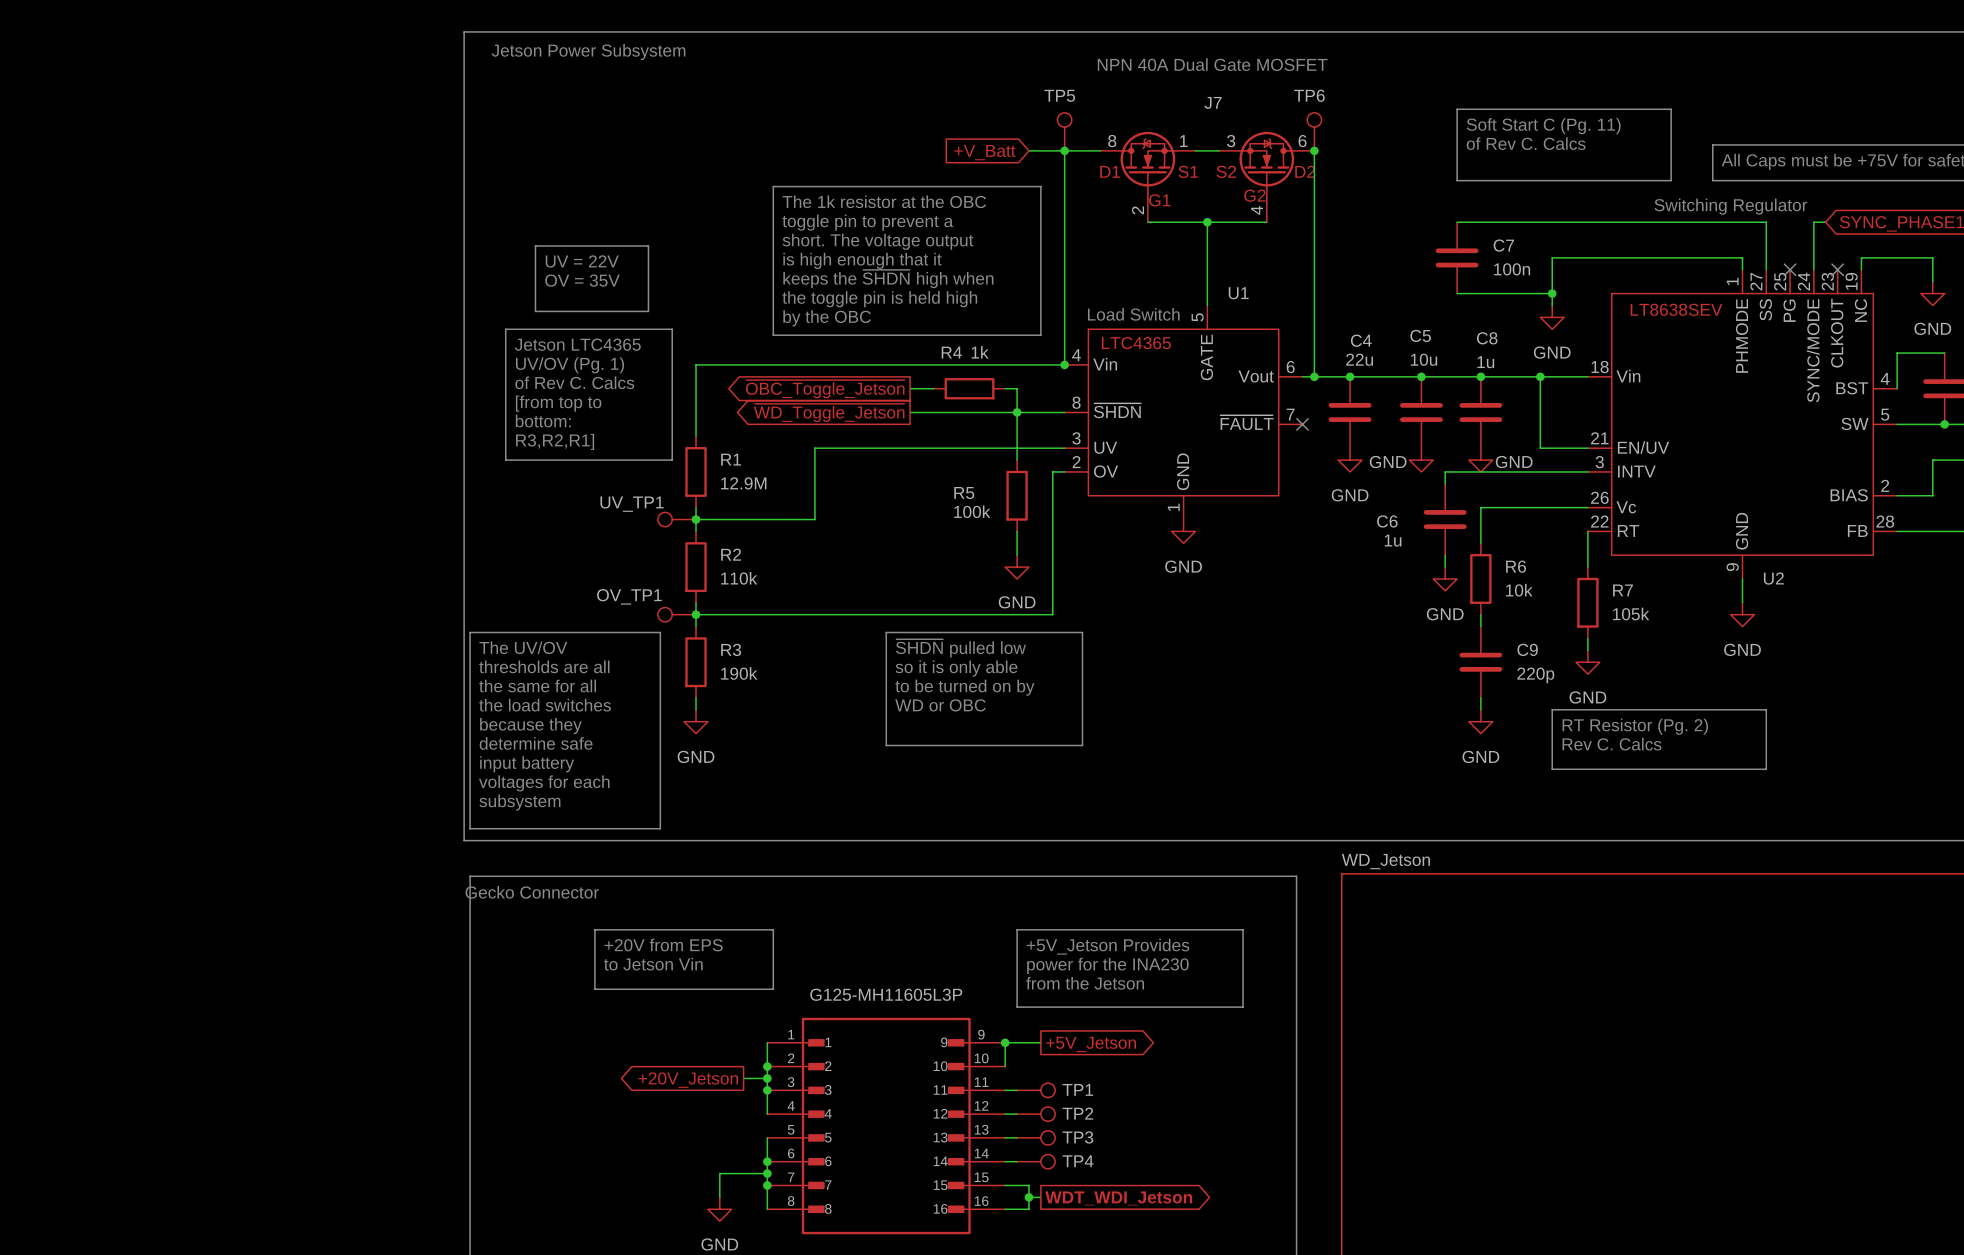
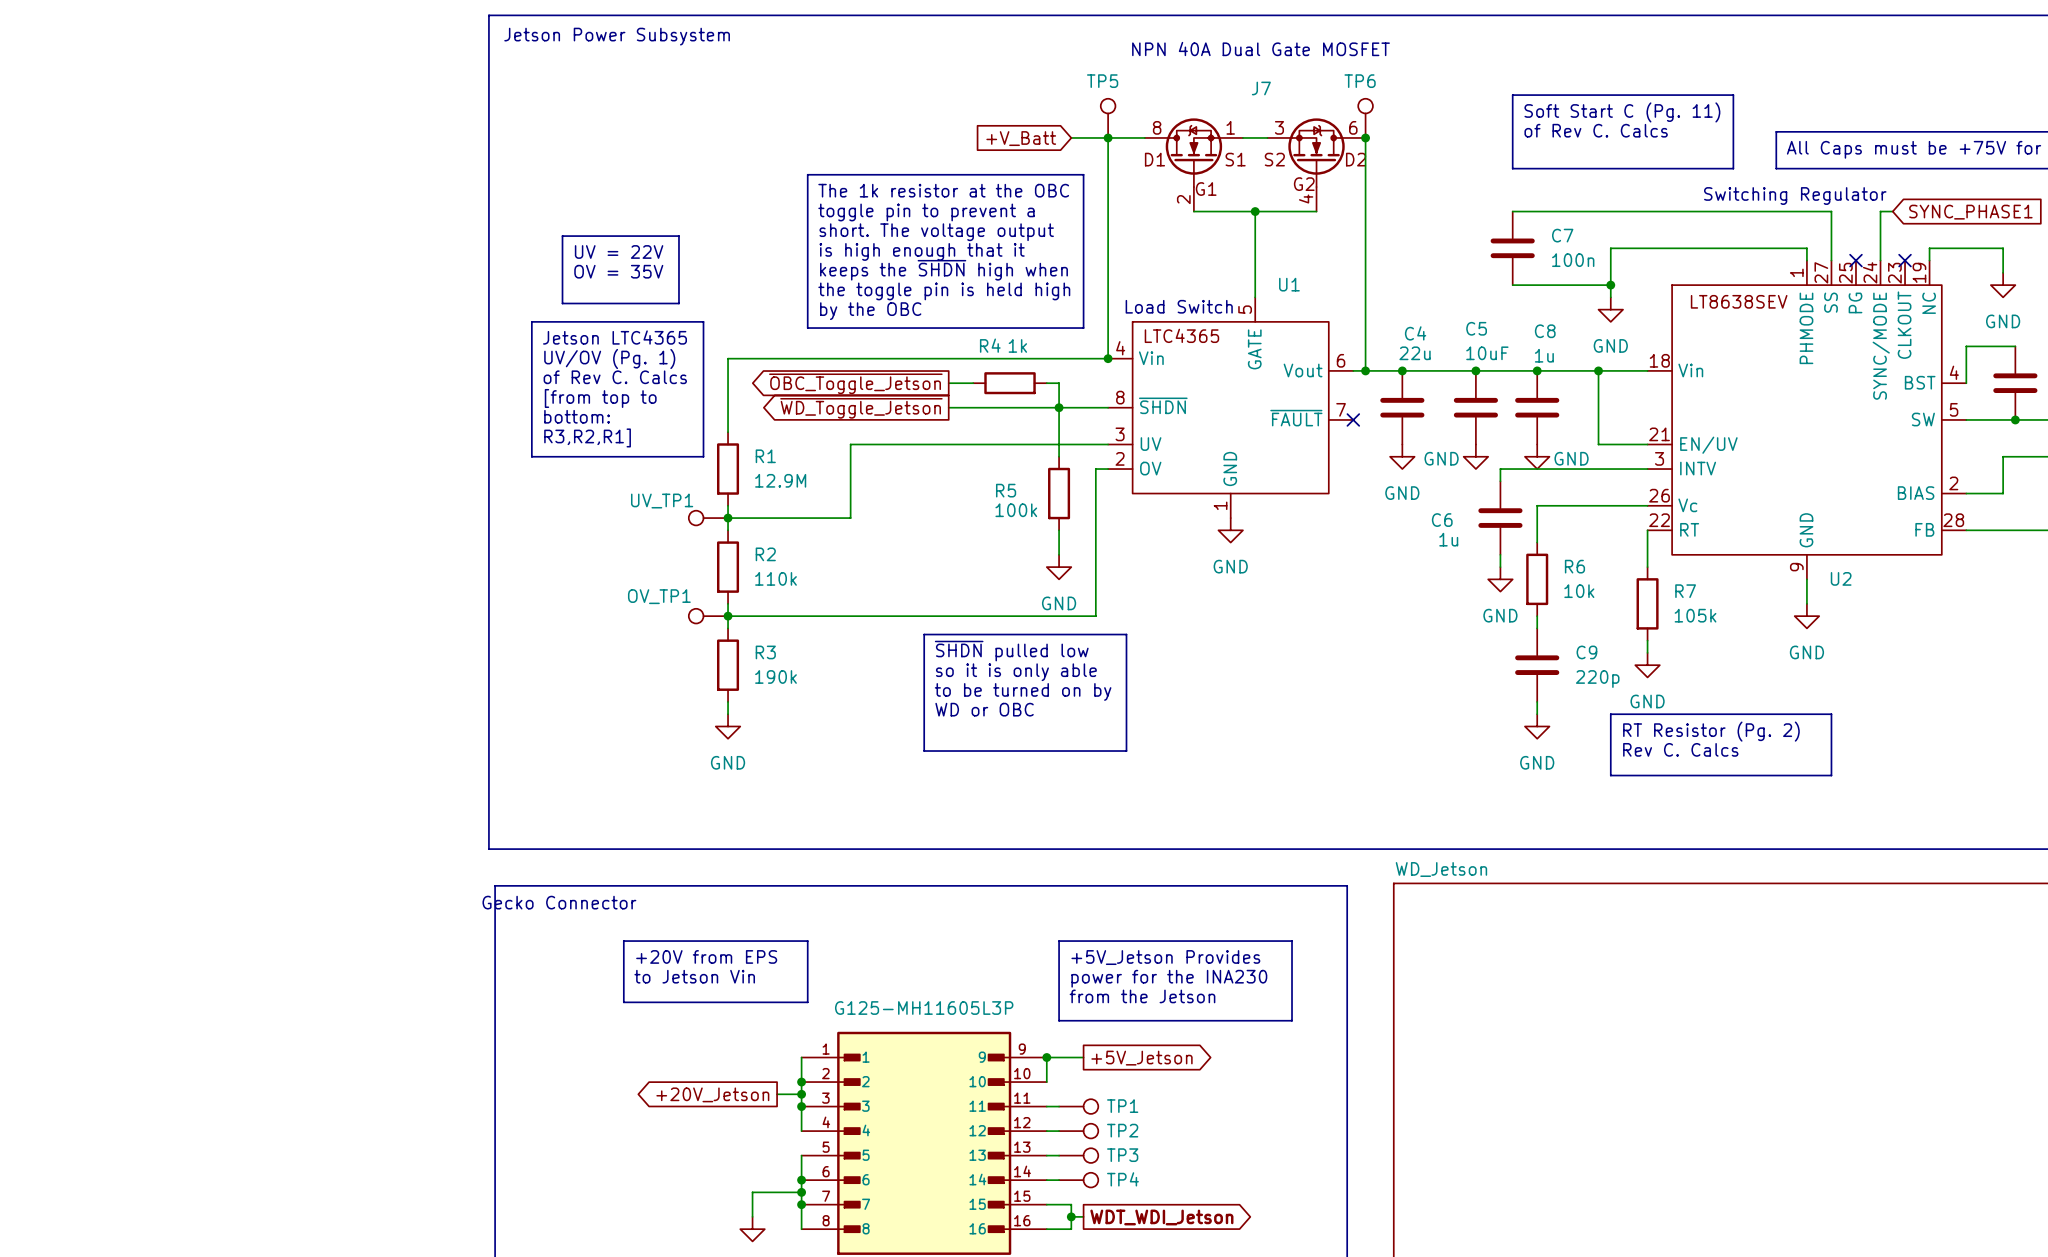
C5 value: 10u (1424, 359) -> 10uF (1487, 353)
line: (470, 632) (660, 632) (660, 828) (470, 828) (470, 632) -> none
text: The UV/OV (523, 647) -> none
text: thresholds are all (544, 666) -> none
text: the same for all (537, 686) -> none
text: the load switches (545, 705) -> none
text: because they (530, 726) -> none
text: determine safe (536, 743) -> none
text: input battery (527, 764) -> none
text: voltages for each (544, 783) -> none
text: subsystem (519, 802) -> none

